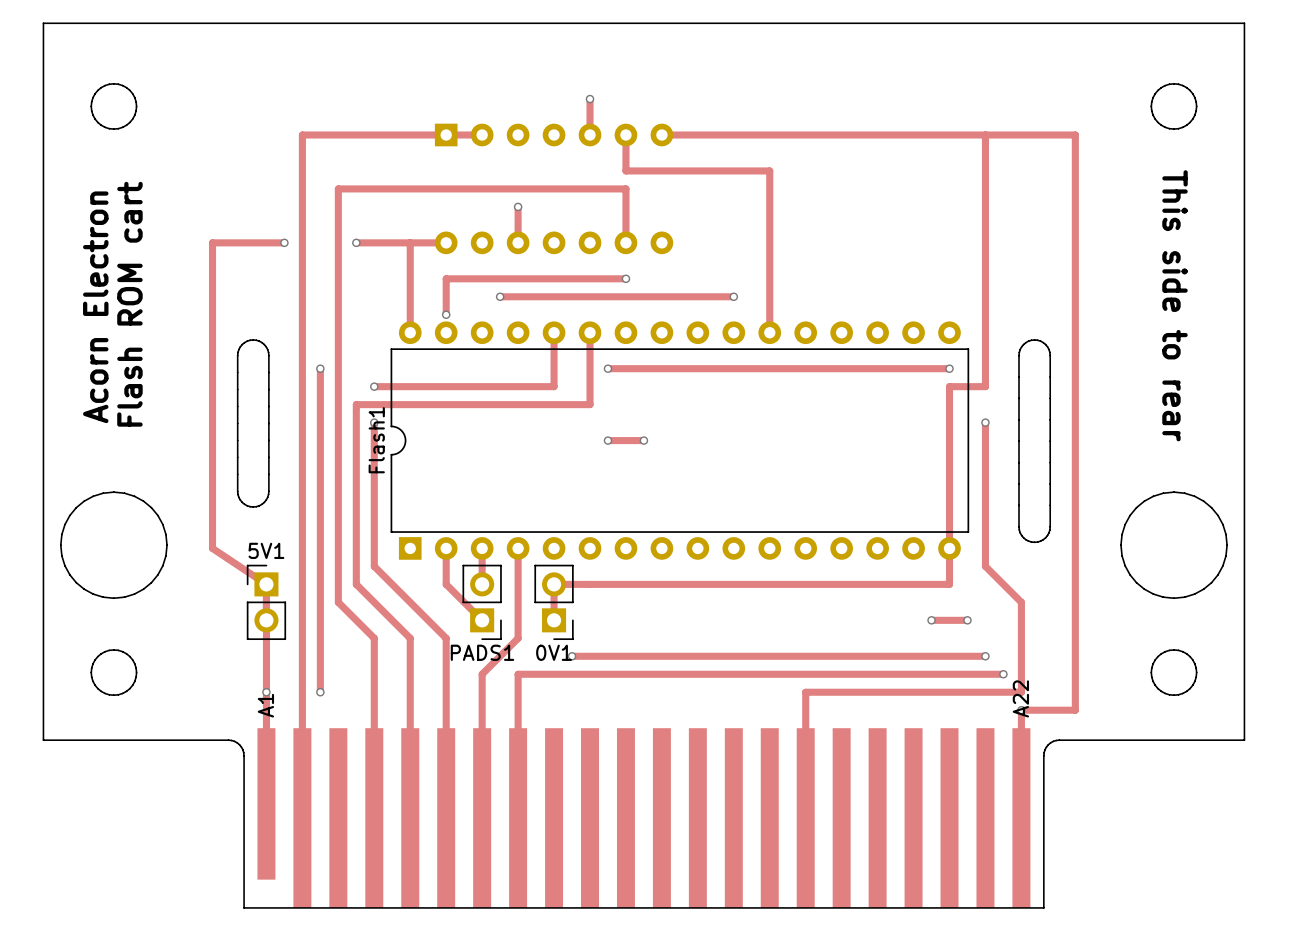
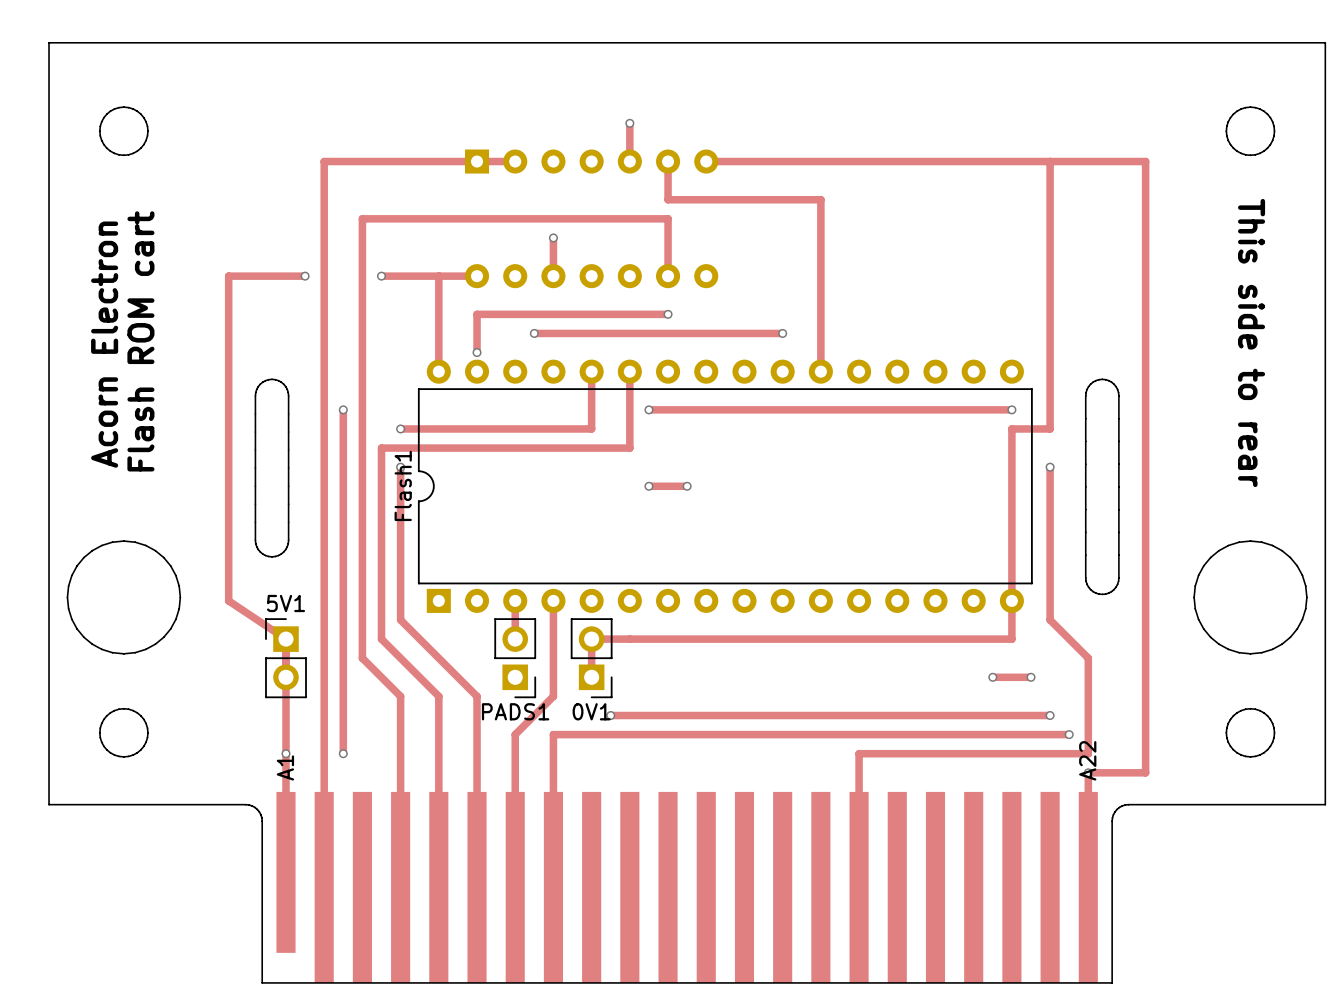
track: (446, 548) (446, 584) (482, 620) -> none

